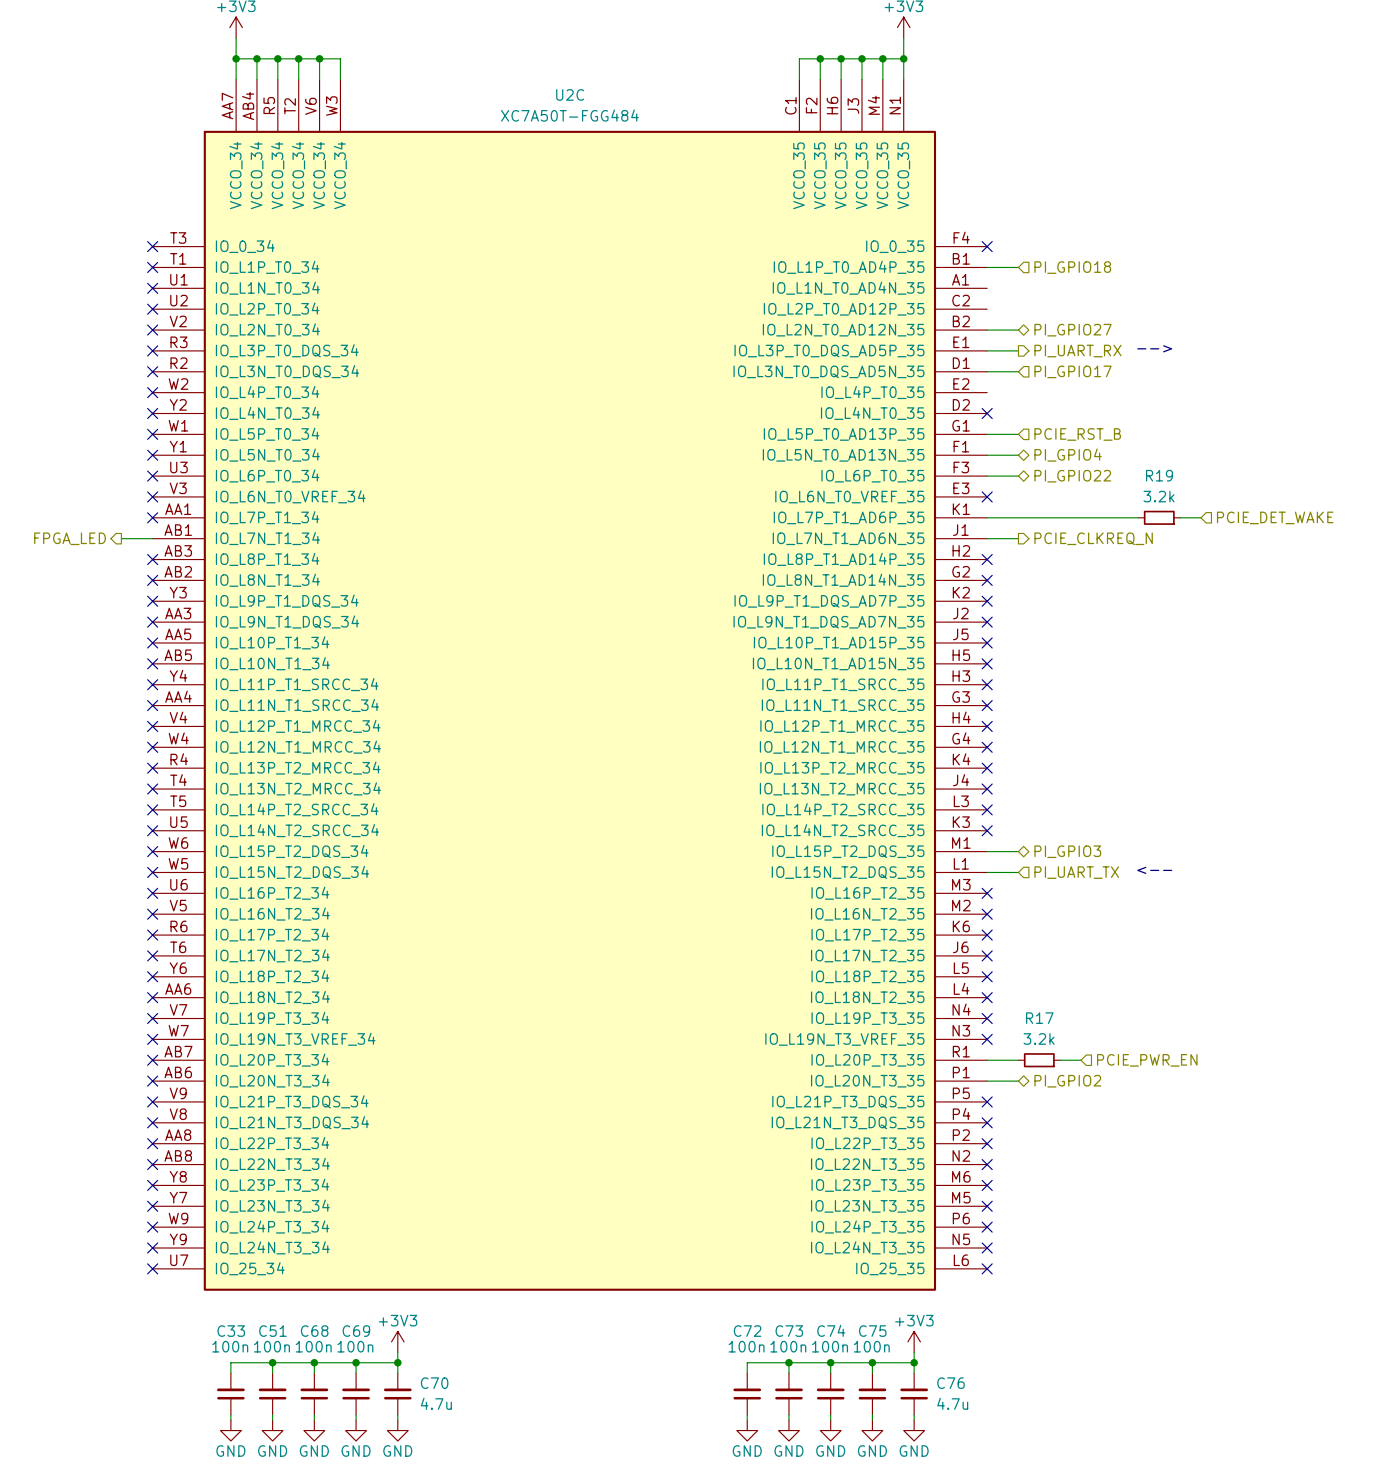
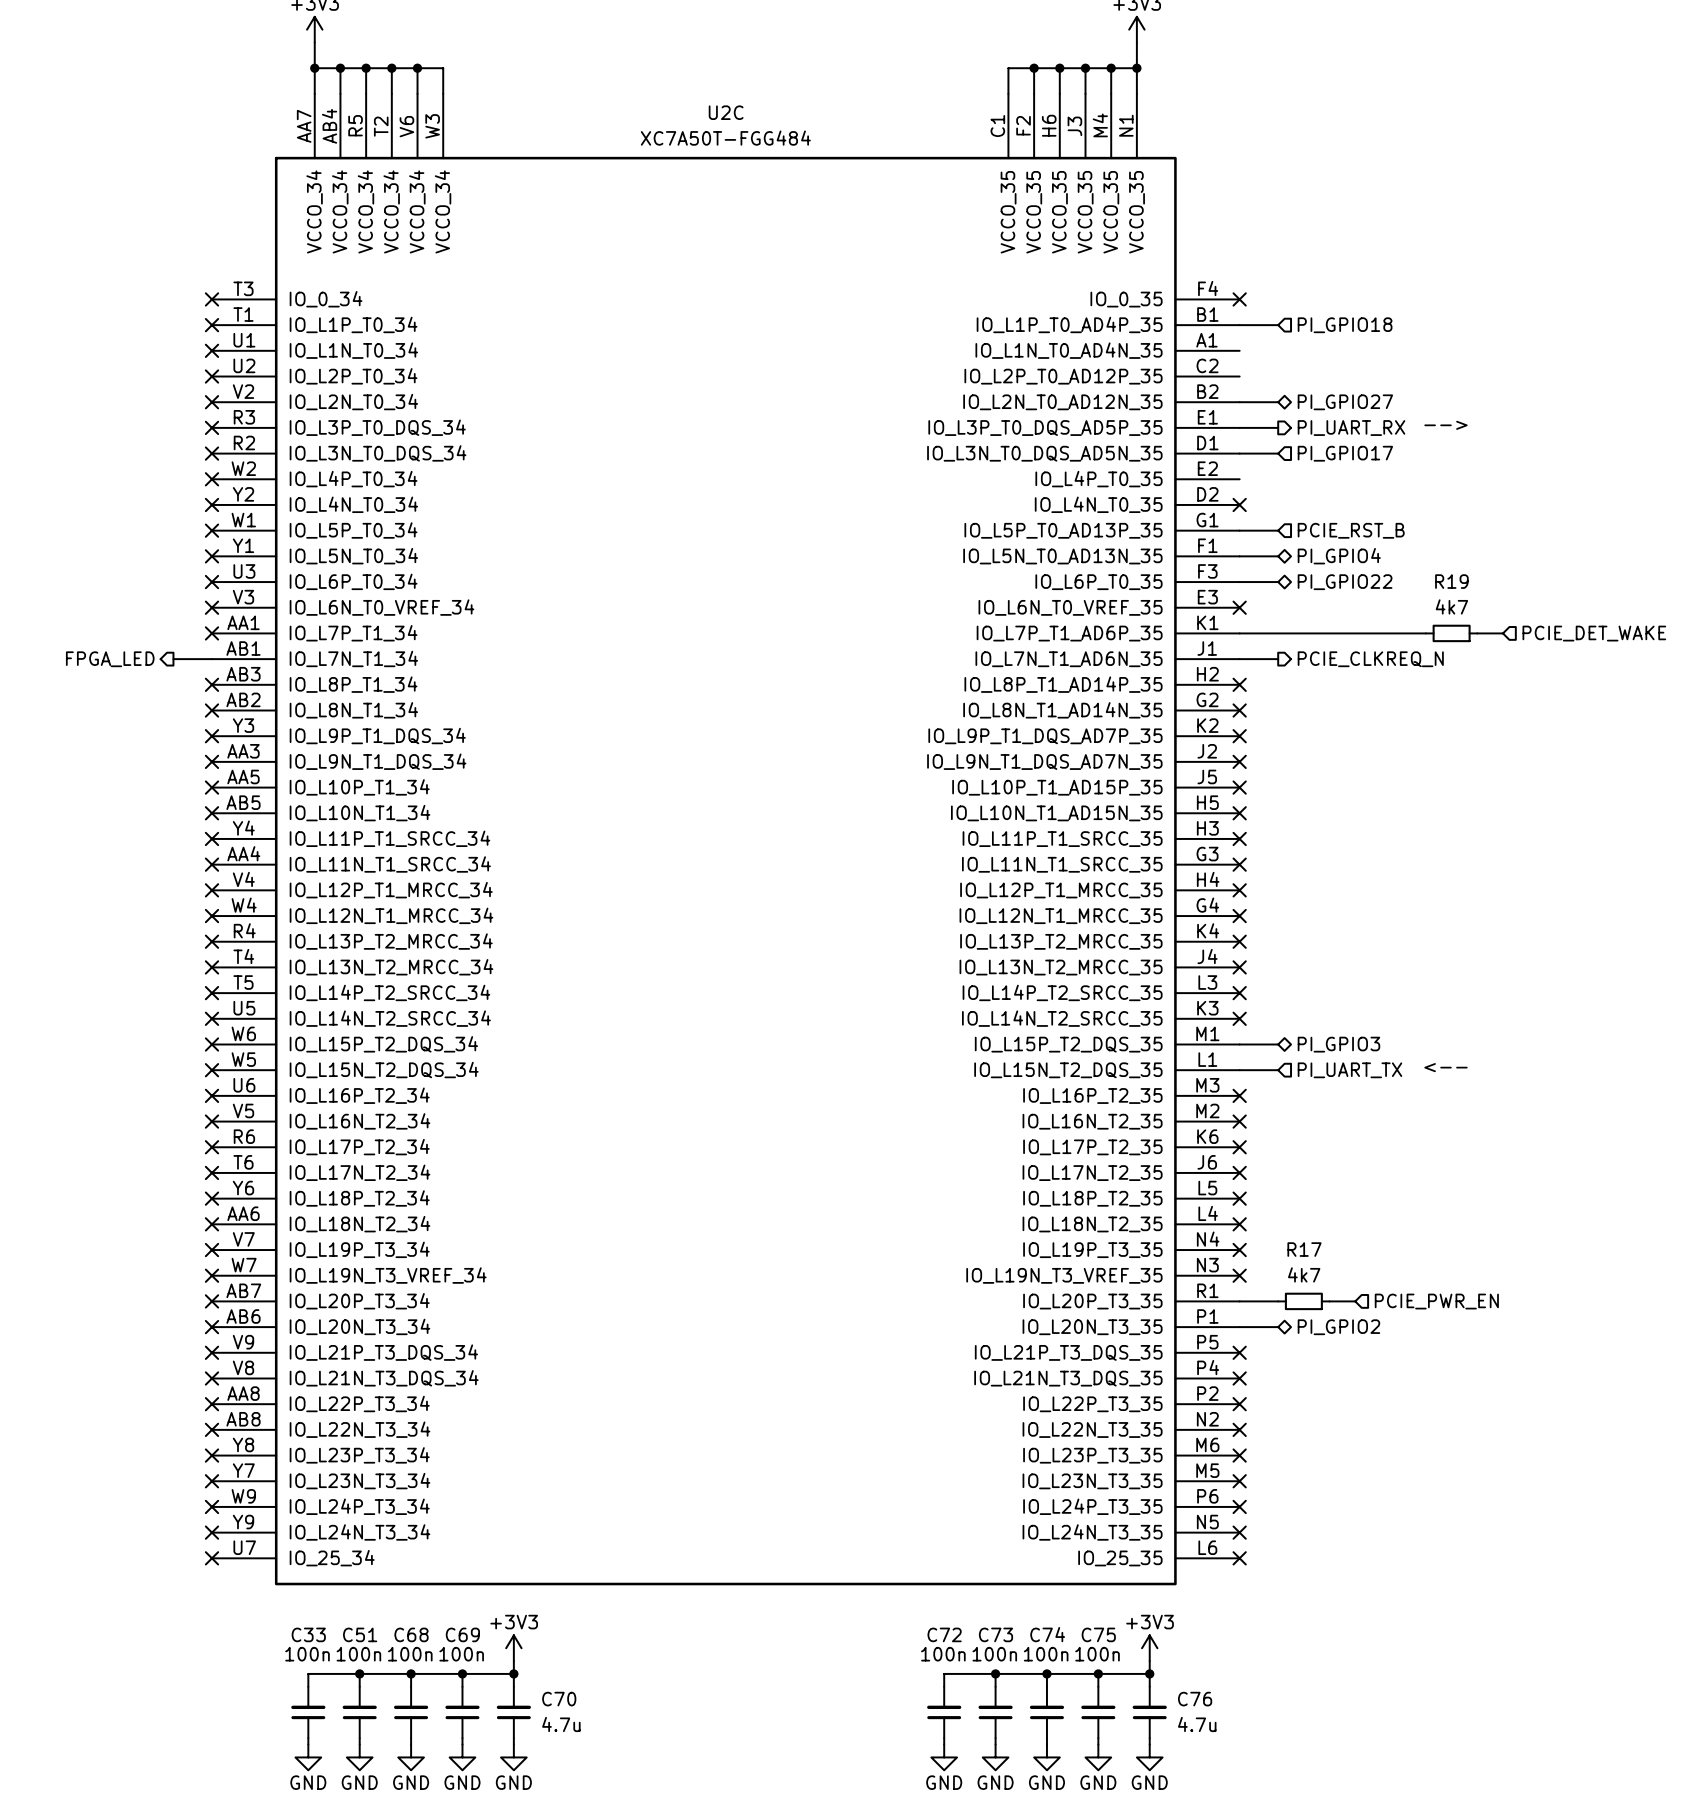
R19 value: 3.2k (1159, 496) -> 4k7 (1451, 606)
R17 value: 3.2k (1039, 1038) -> 4k7 (1304, 1274)

